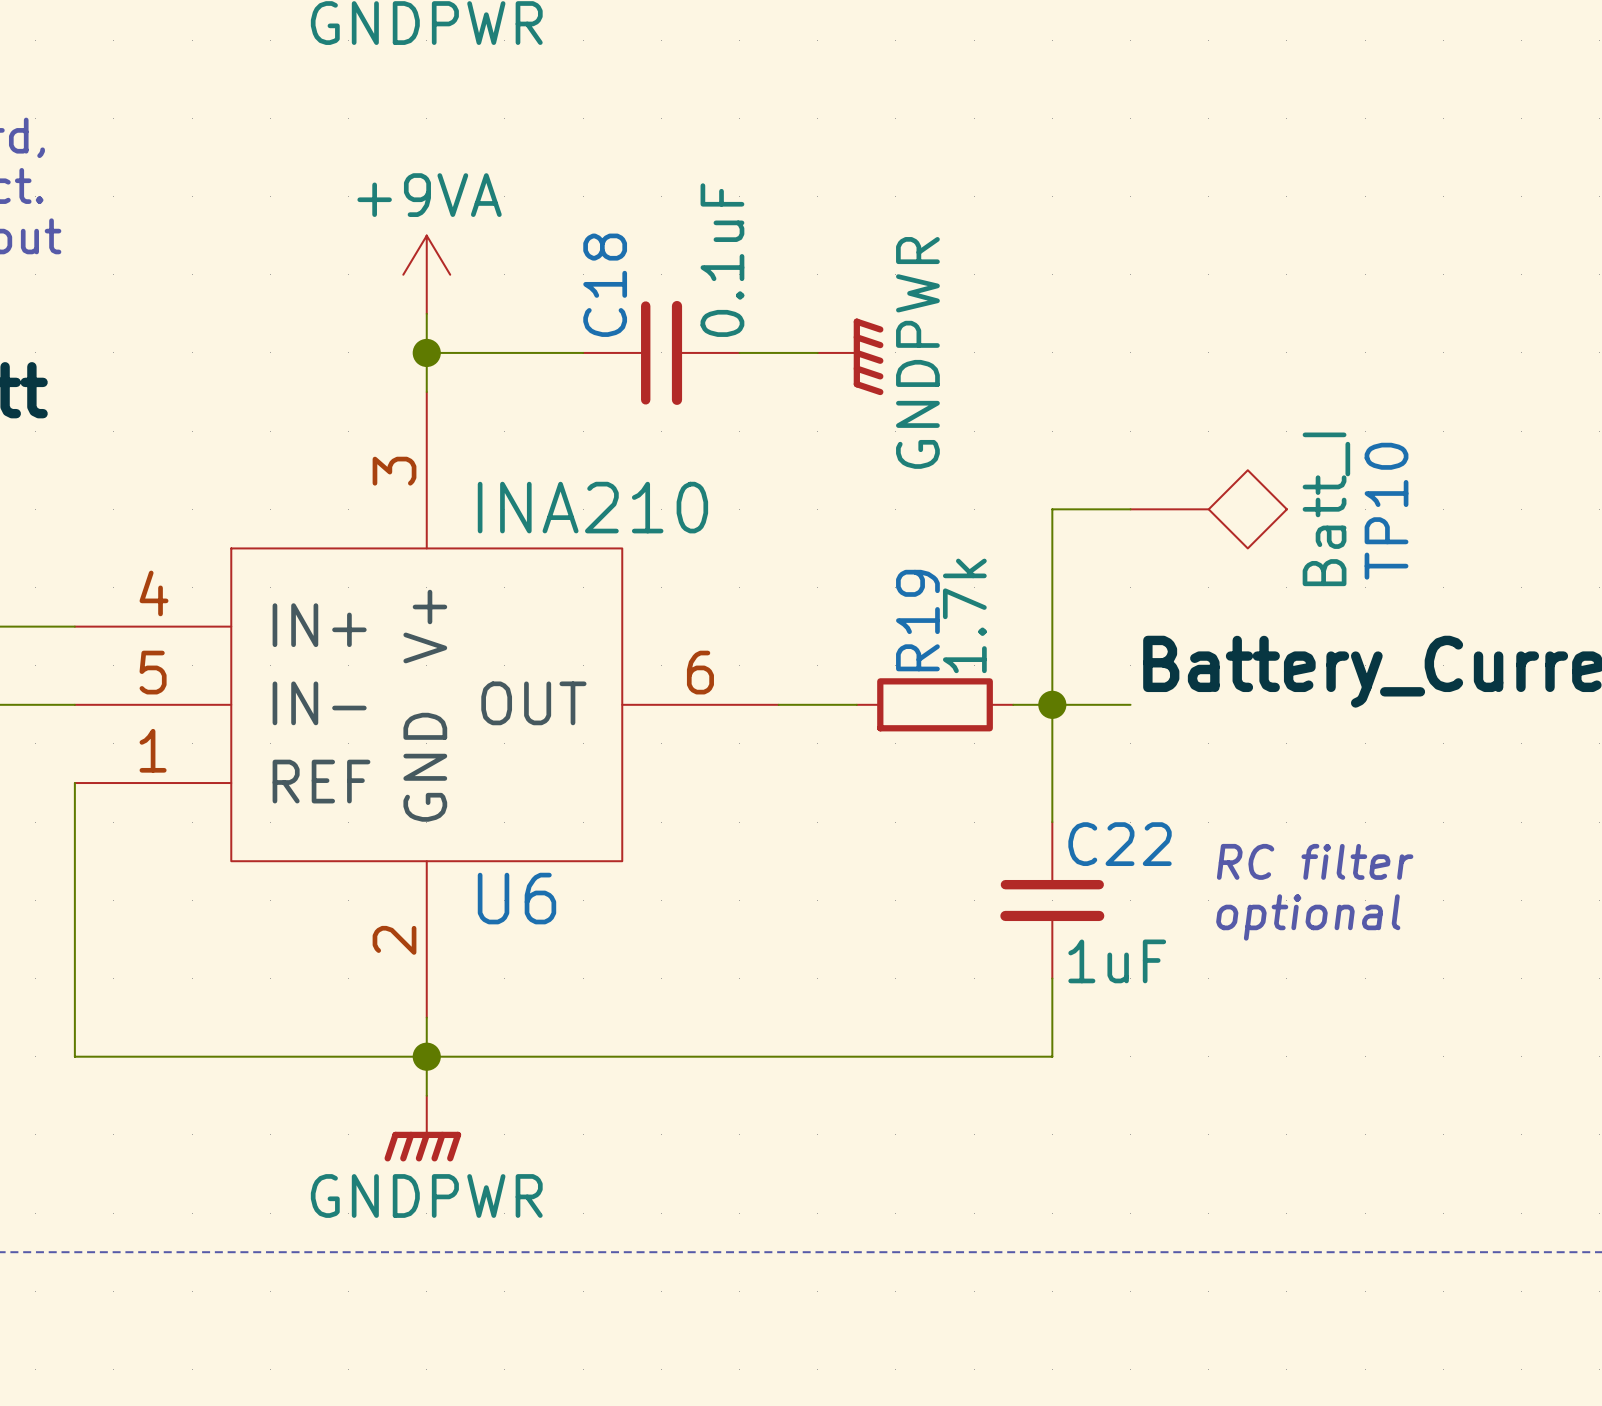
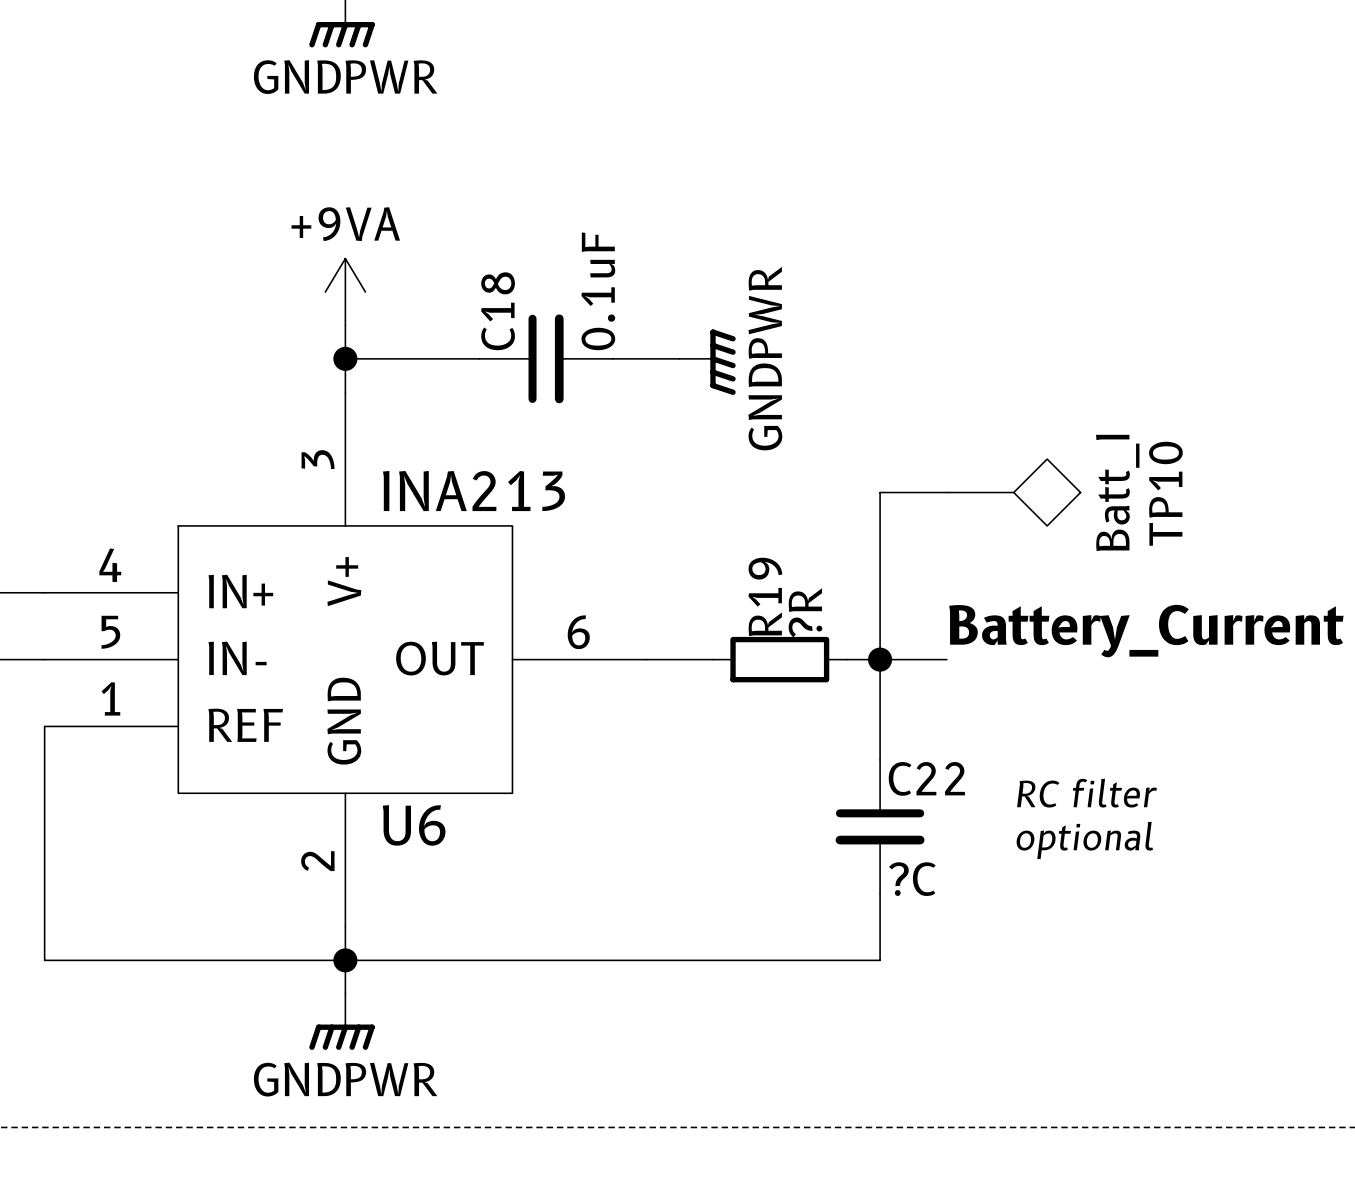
U6 value: INA210 (592, 507) -> INA213 (474, 491)
R19 value: 1.7k (964, 615) -> ?R (805, 612)
C22 value: 1uF (1117, 961) -> ?C (912, 879)

